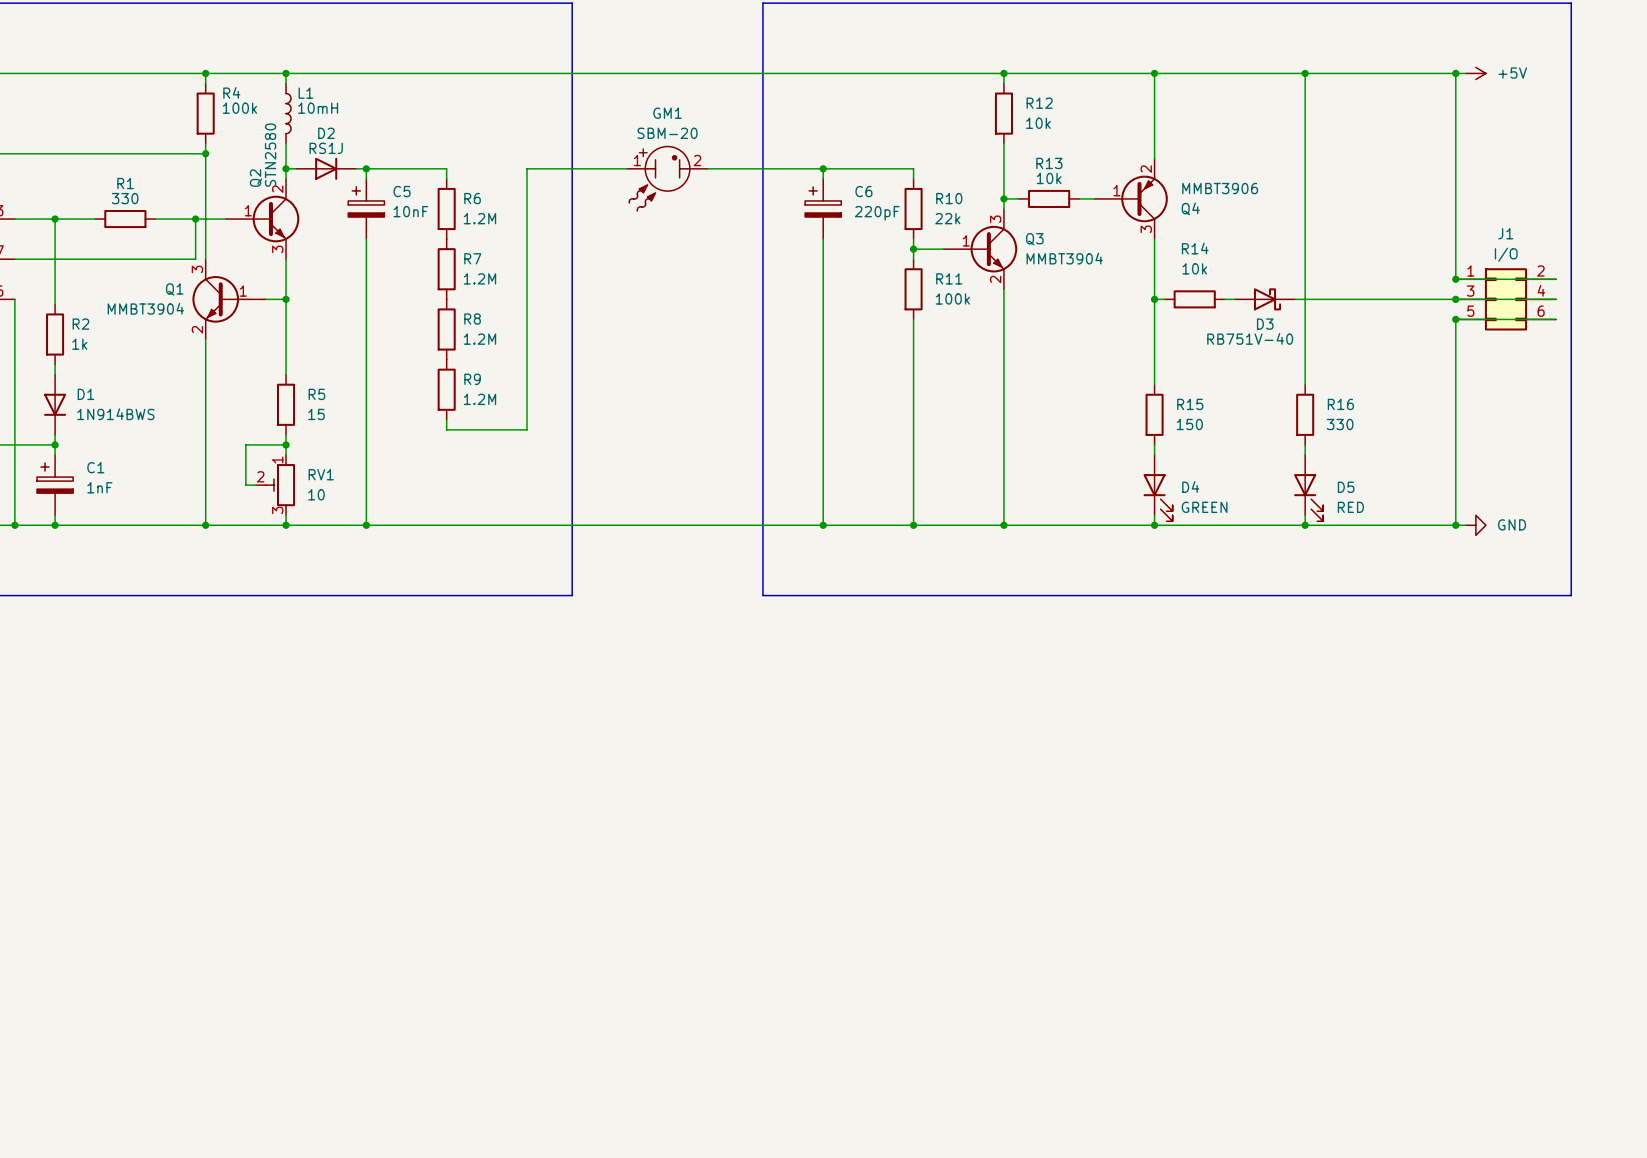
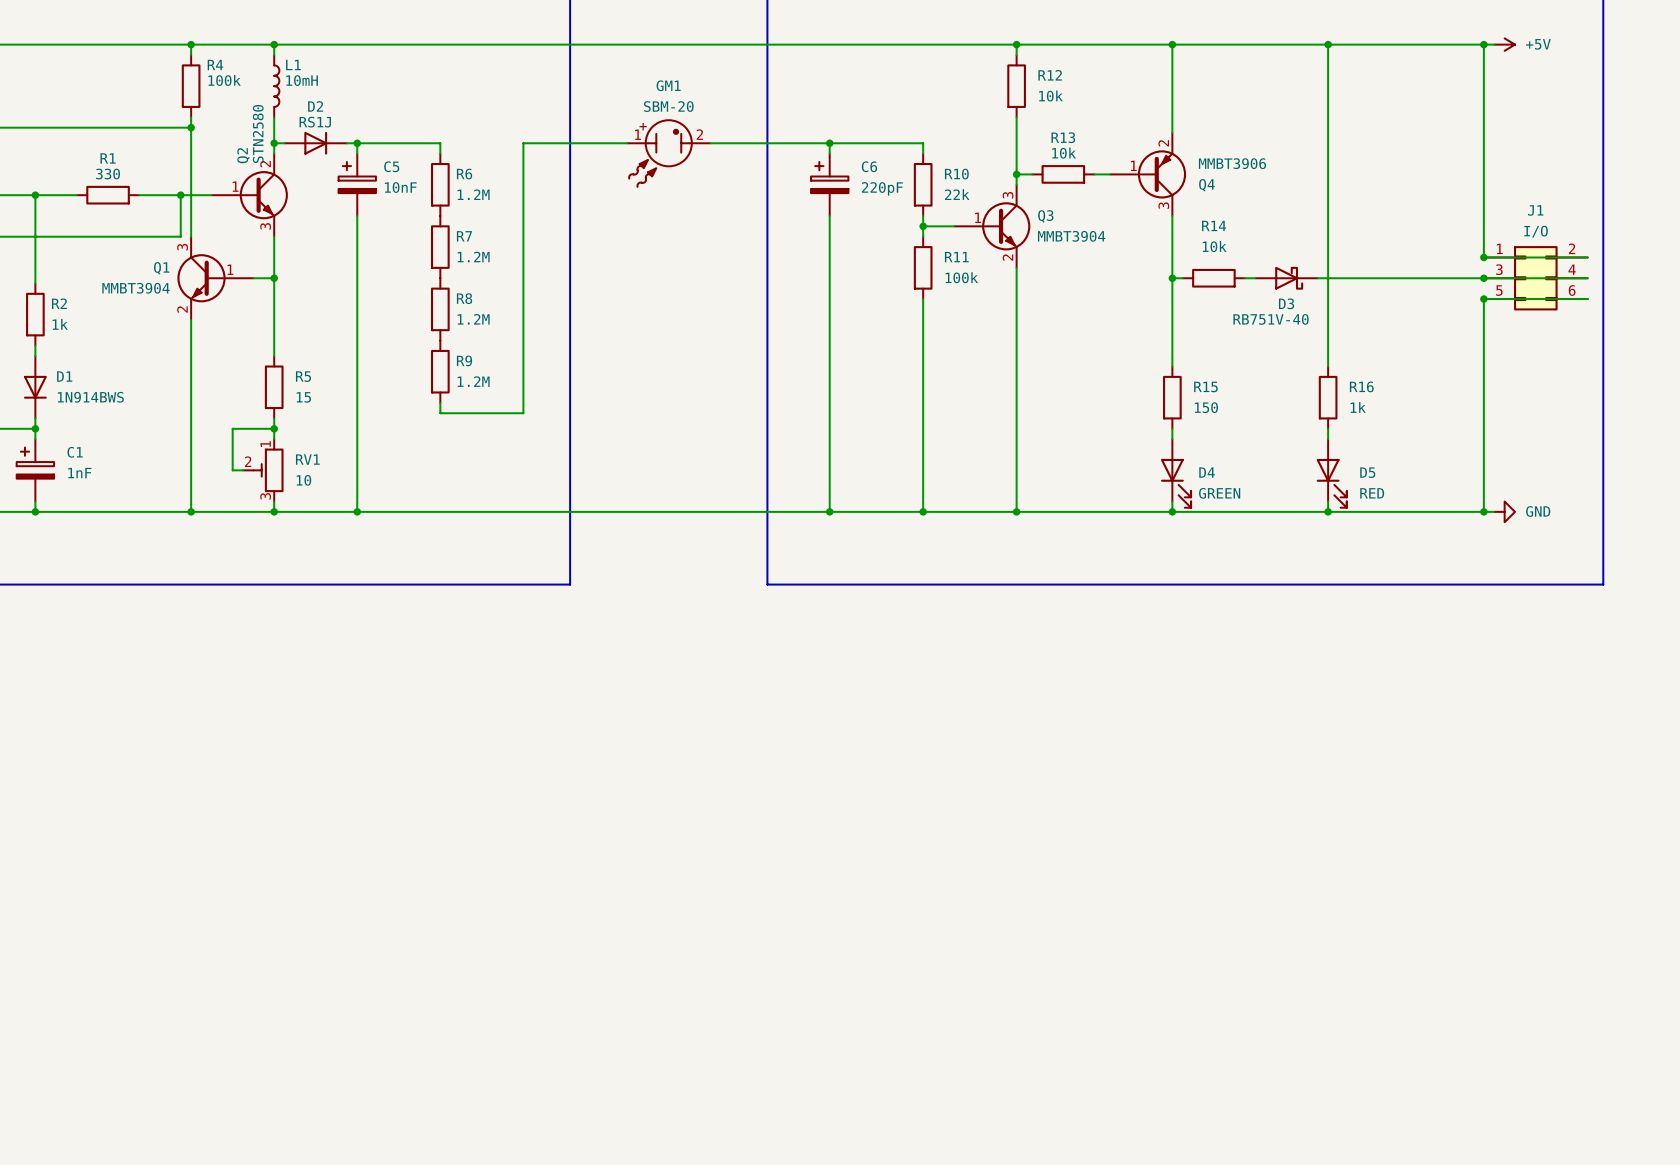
R16 value: 330 (1340, 424) -> 1k (1358, 407)

